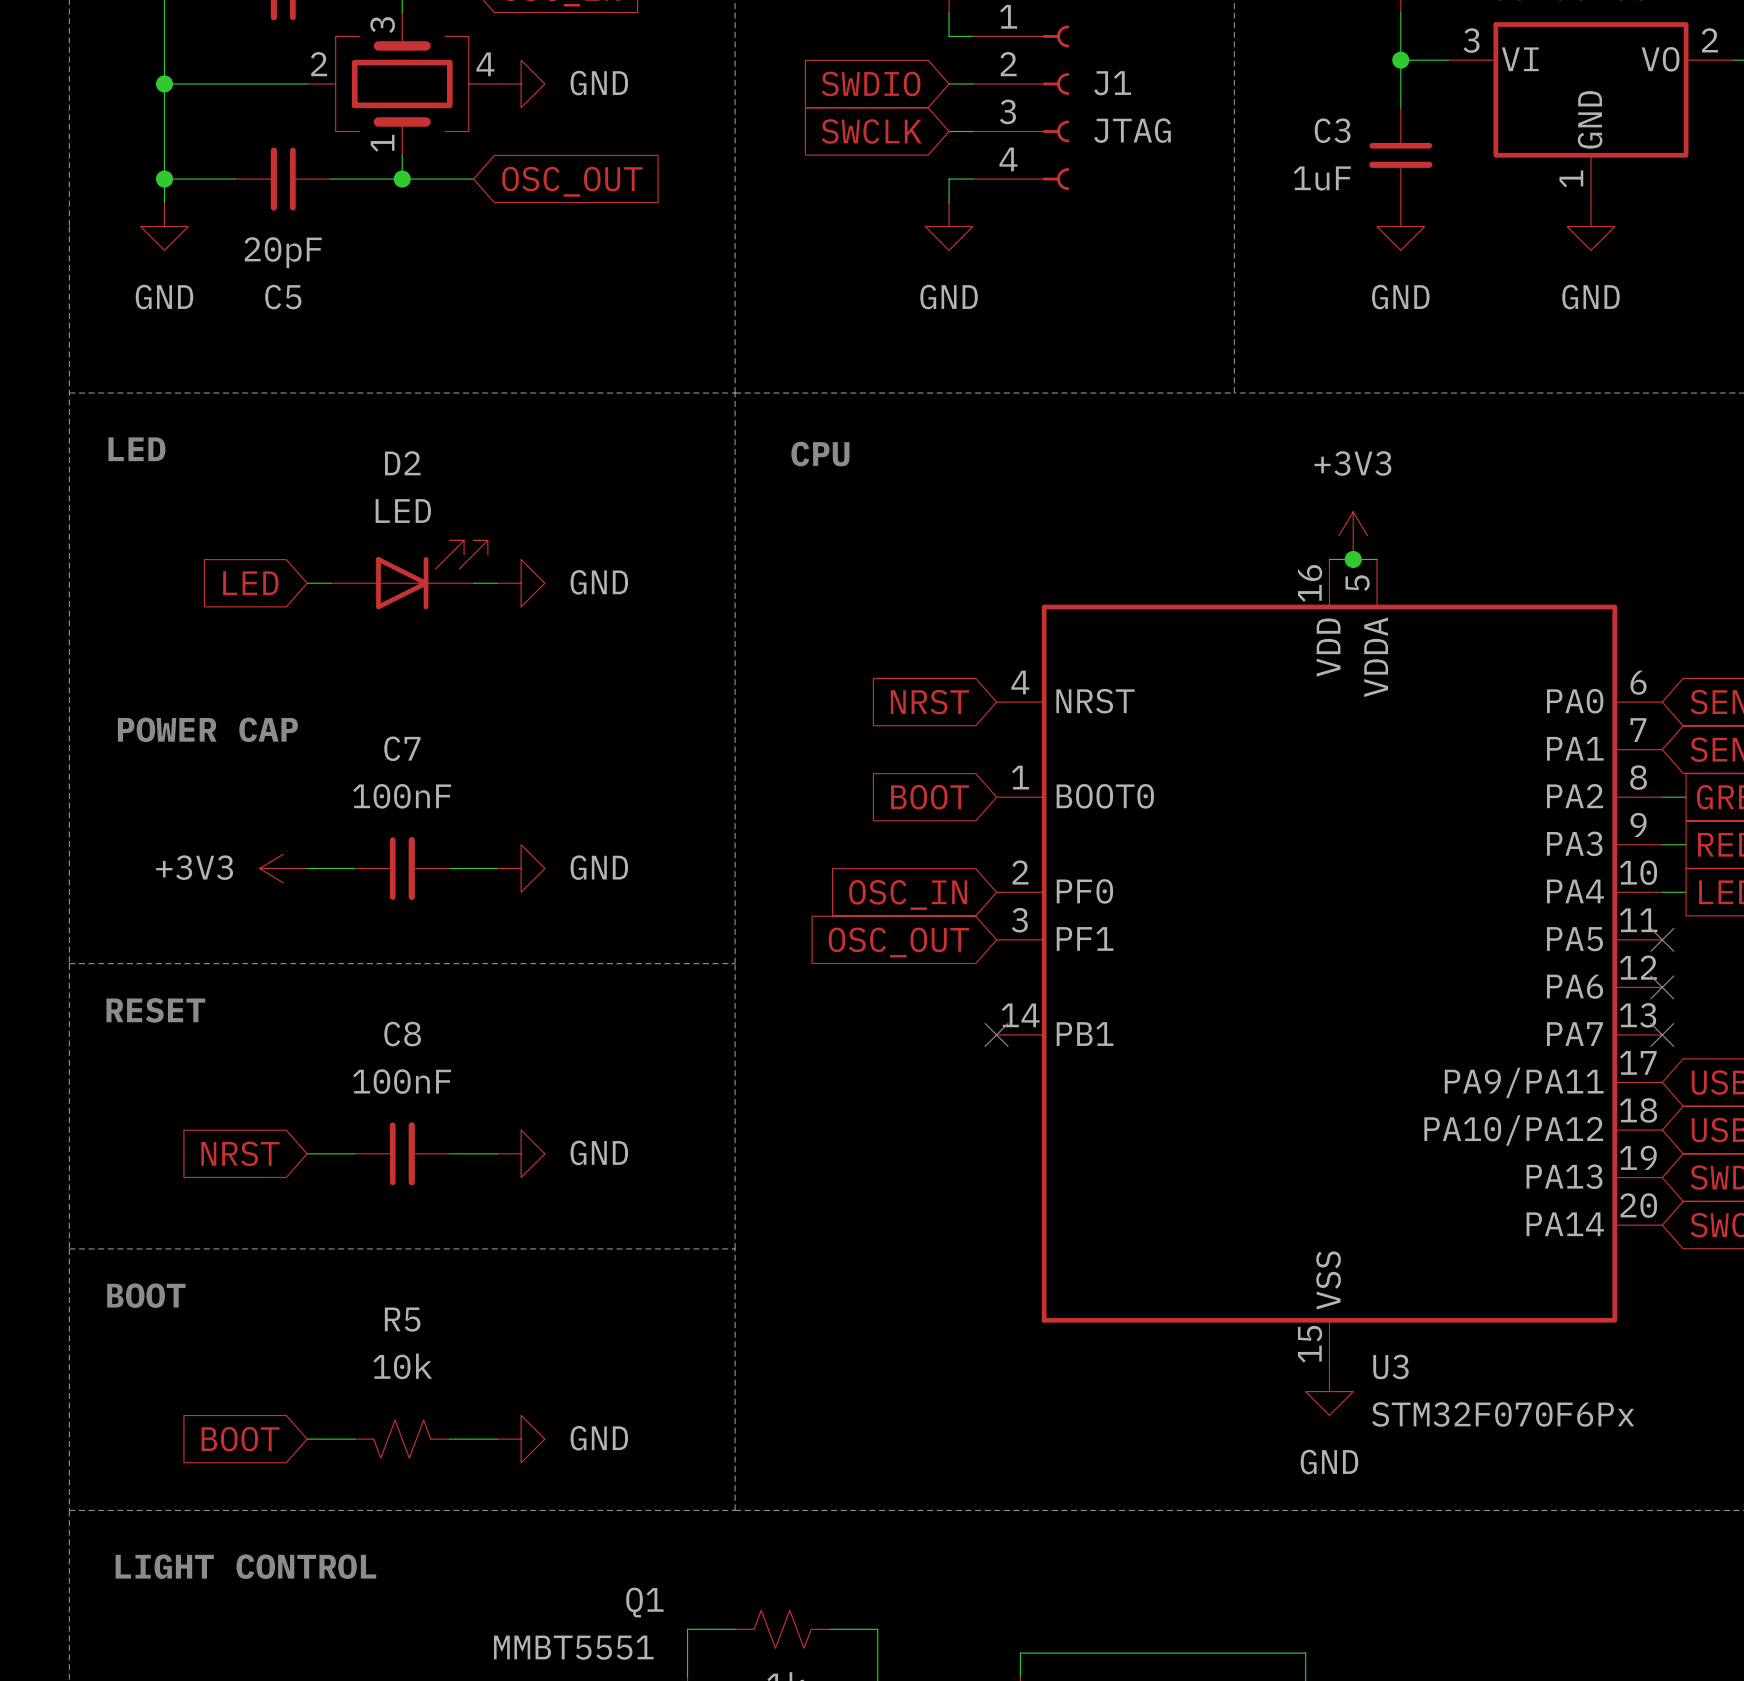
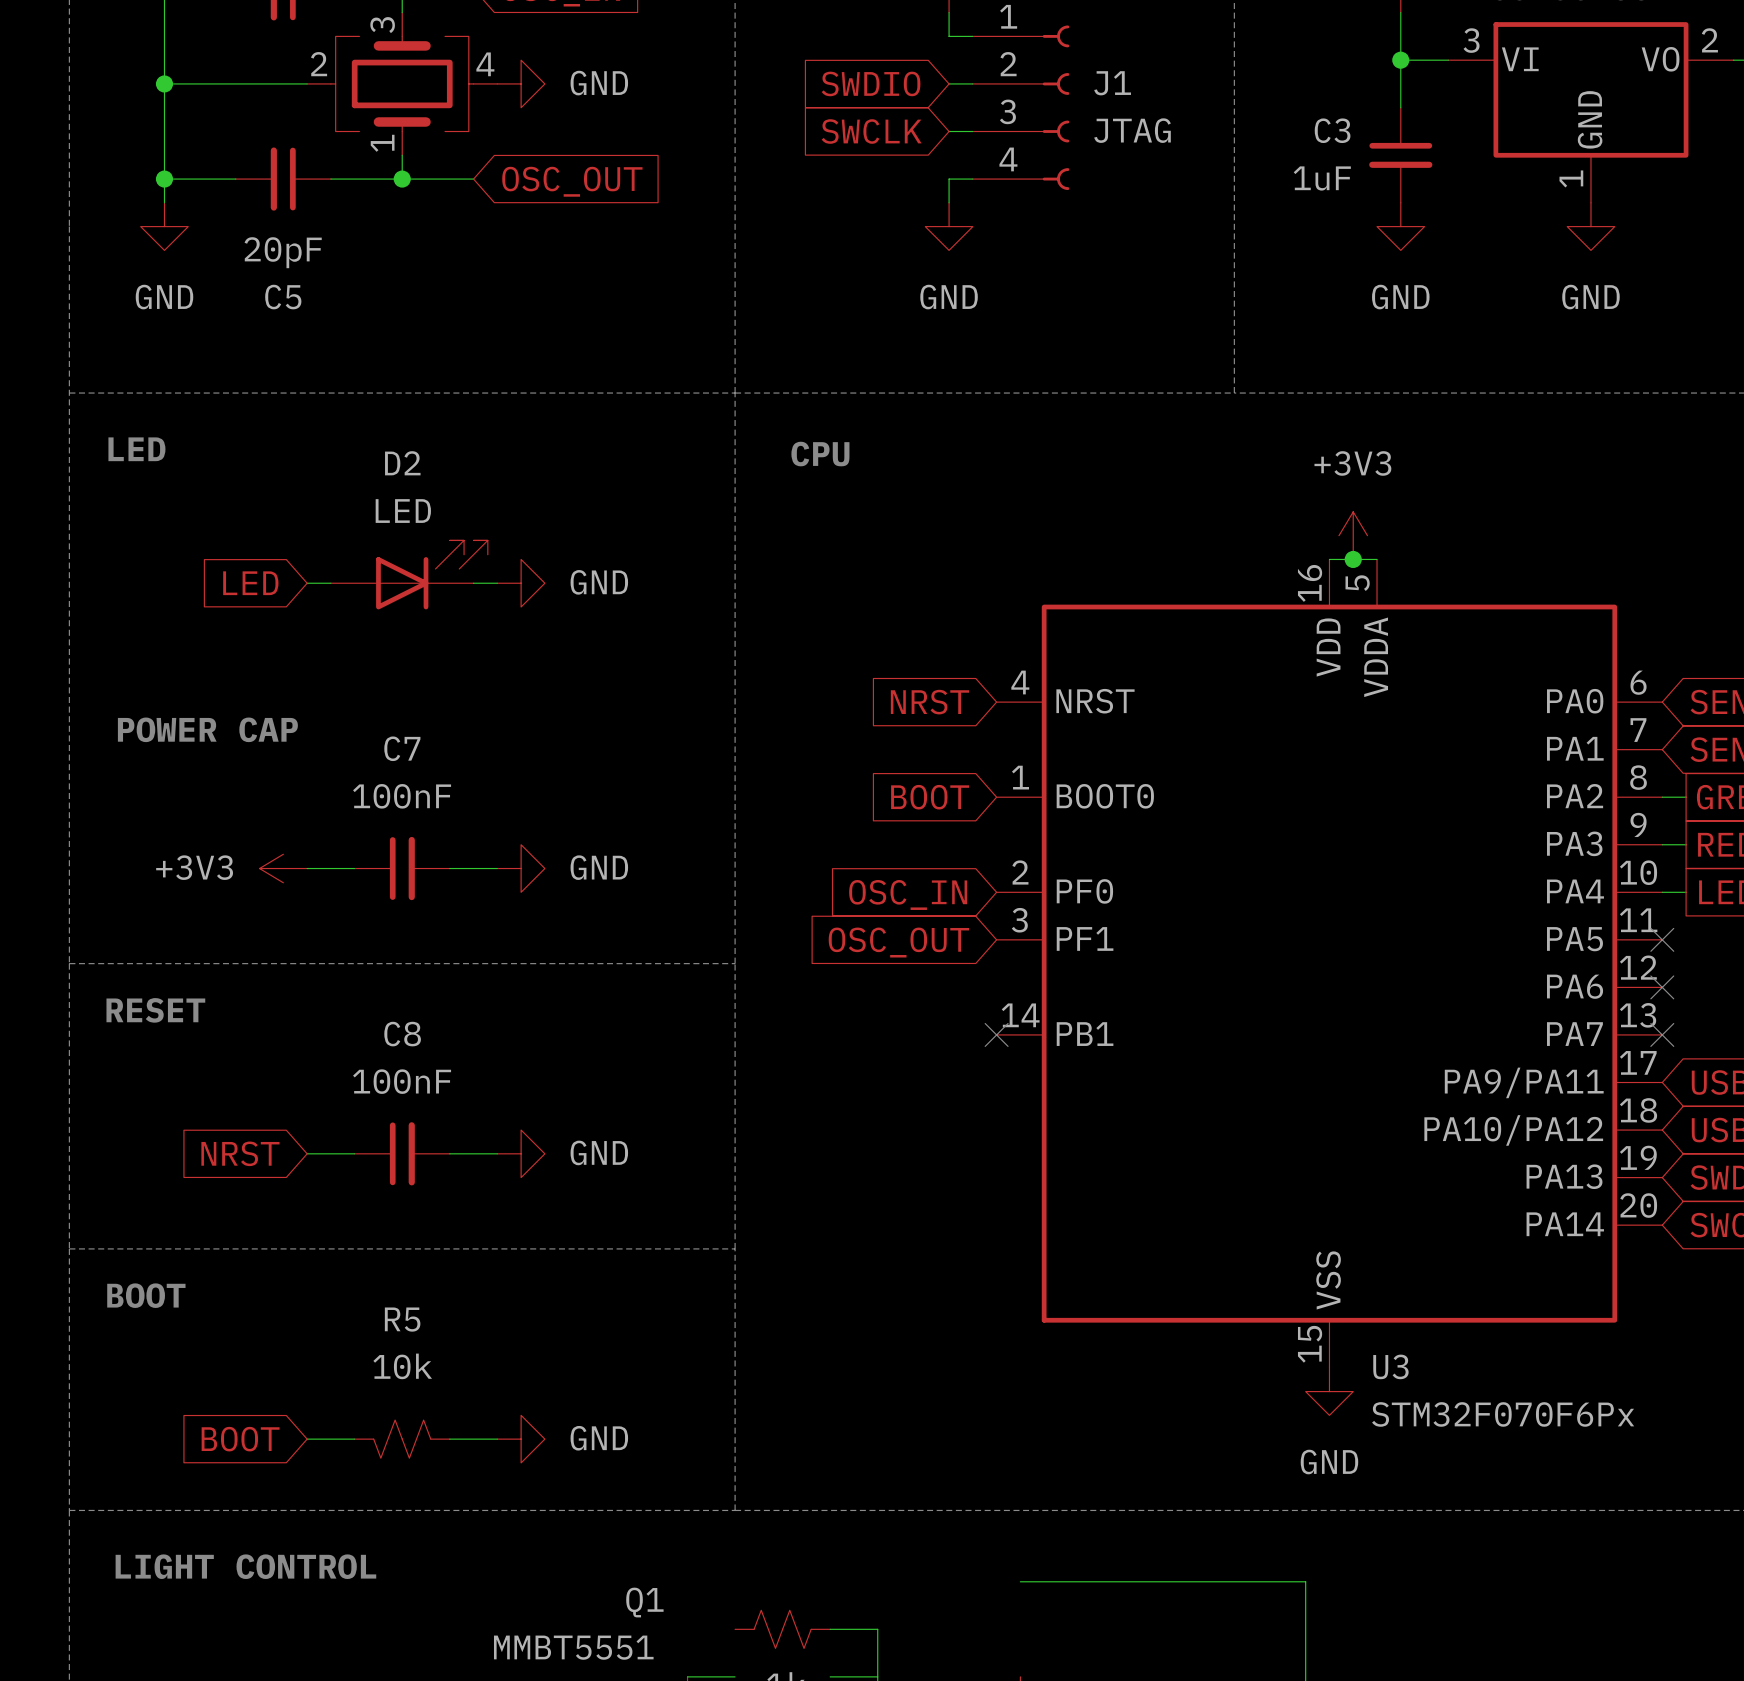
wire: (735, 1629) (687, 1629) (687, 1676) -> (735, 1676) (687, 1676)
wire: (1305, 1653) (1020, 1653) (1020, 1676) -> (1305, 1653) (1305, 1581) (1020, 1581)
wire: none -> (830, 1676) (877, 1676)

